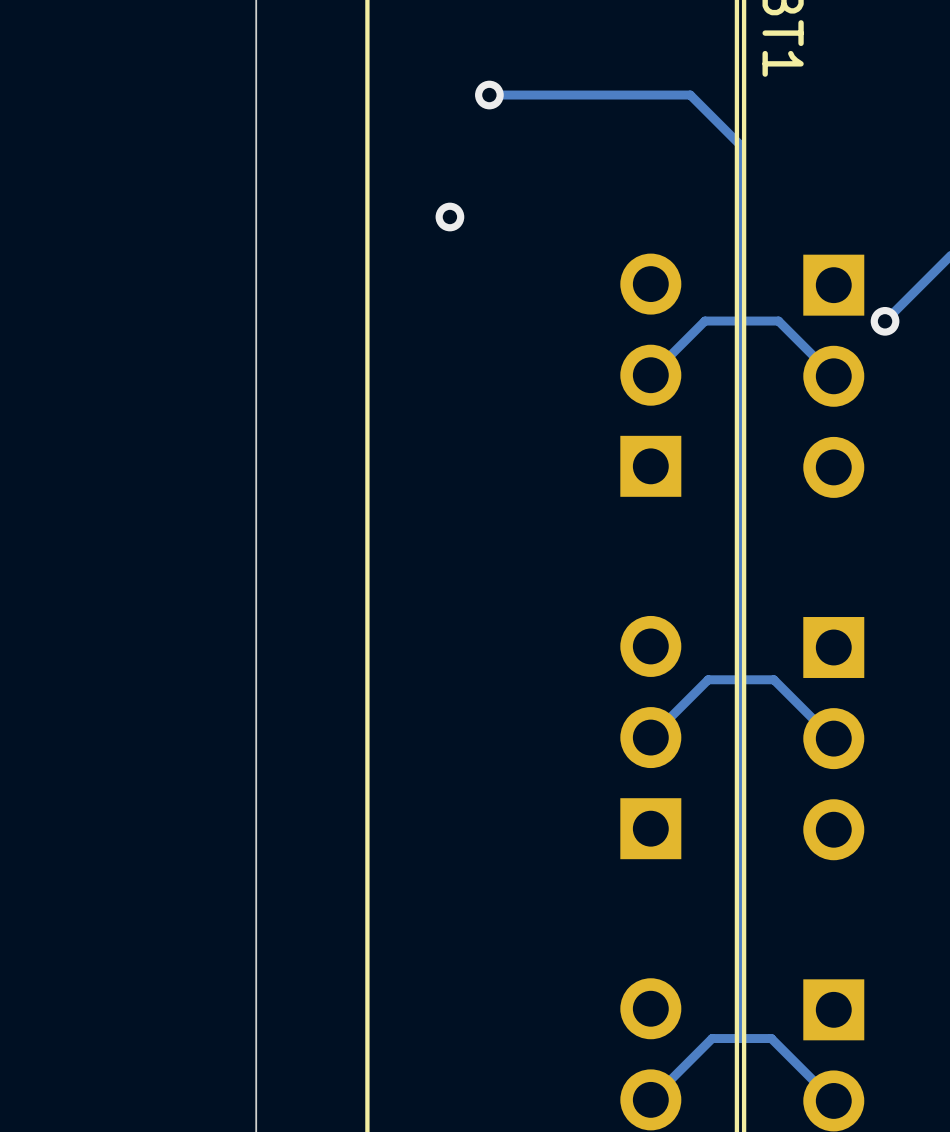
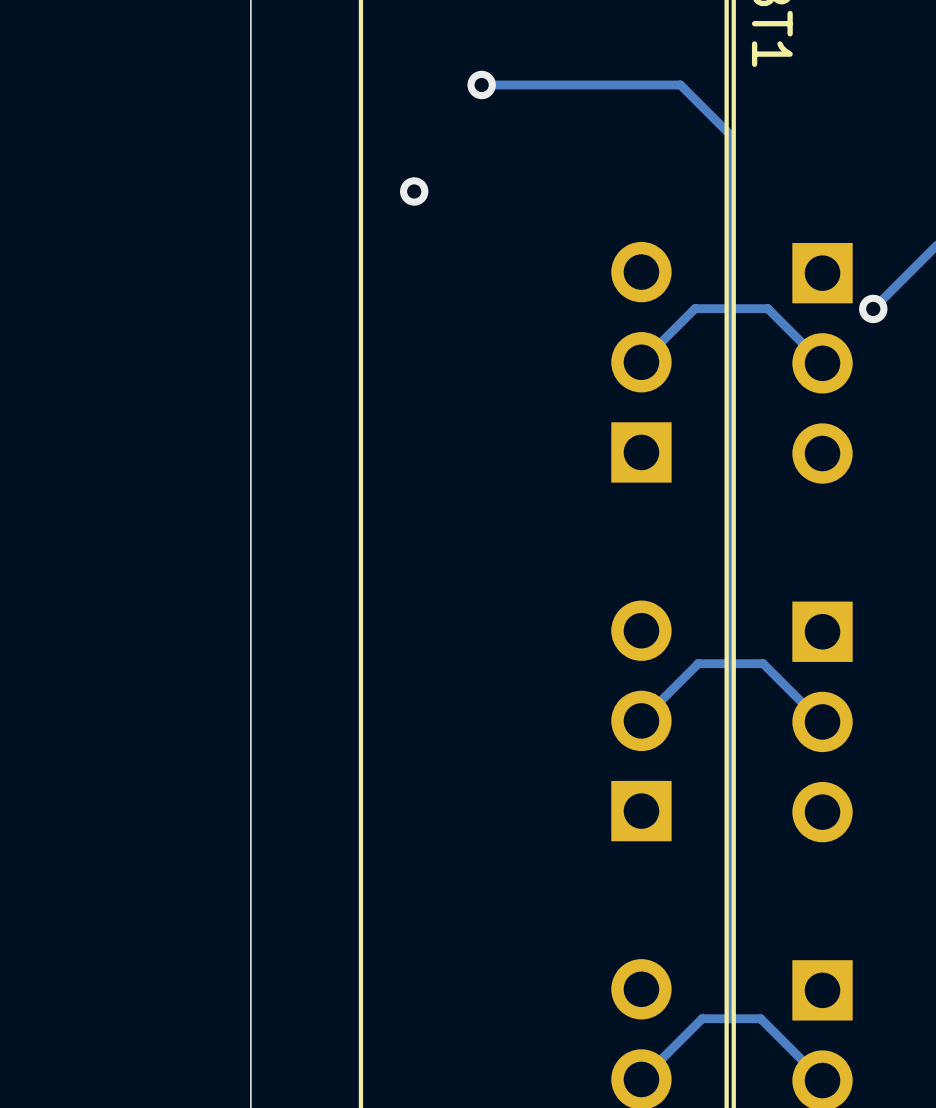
via position: (449, 217) -> (414, 191)

